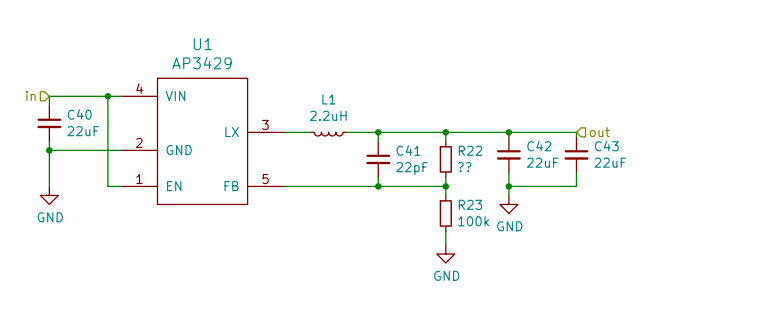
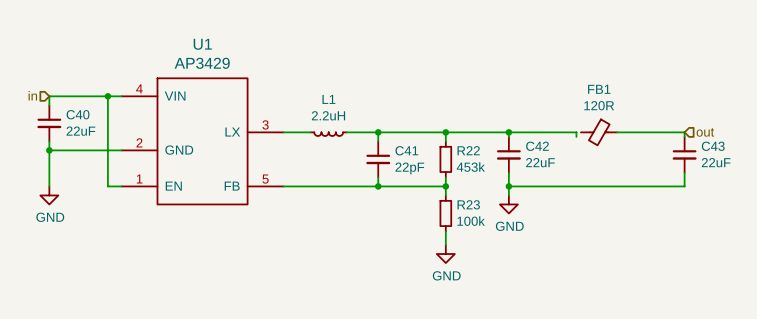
hierarchical label position: out (599, 132) -> out (705, 132)
FB1: none -> 120R (599, 132)
wire: none -> (617, 132) (684, 132) (684, 136)
C43 position: (576, 154) -> (684, 154)
R22 value: ?? (464, 167) -> 453k (470, 167)
wire: (576, 172) (576, 186) -> (684, 172) (684, 186) (576, 186)

